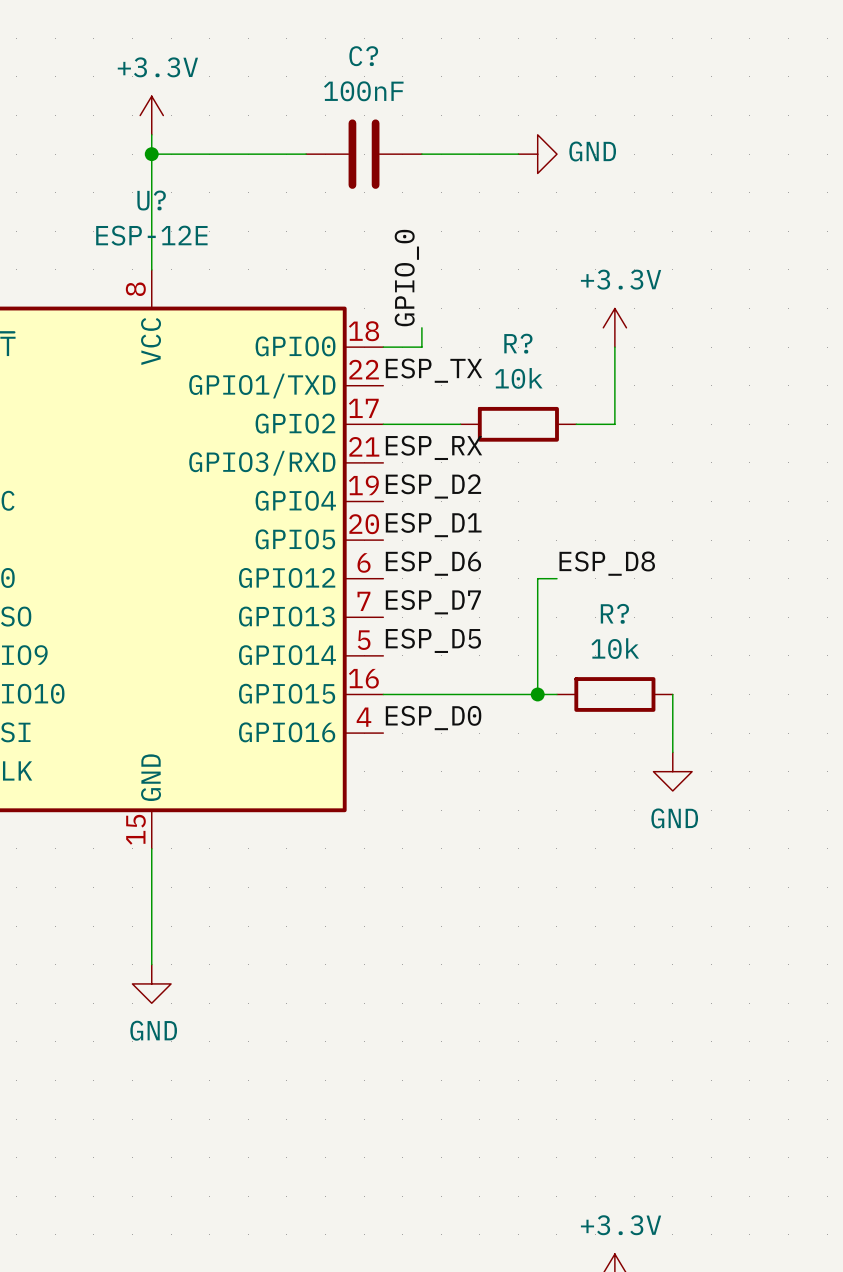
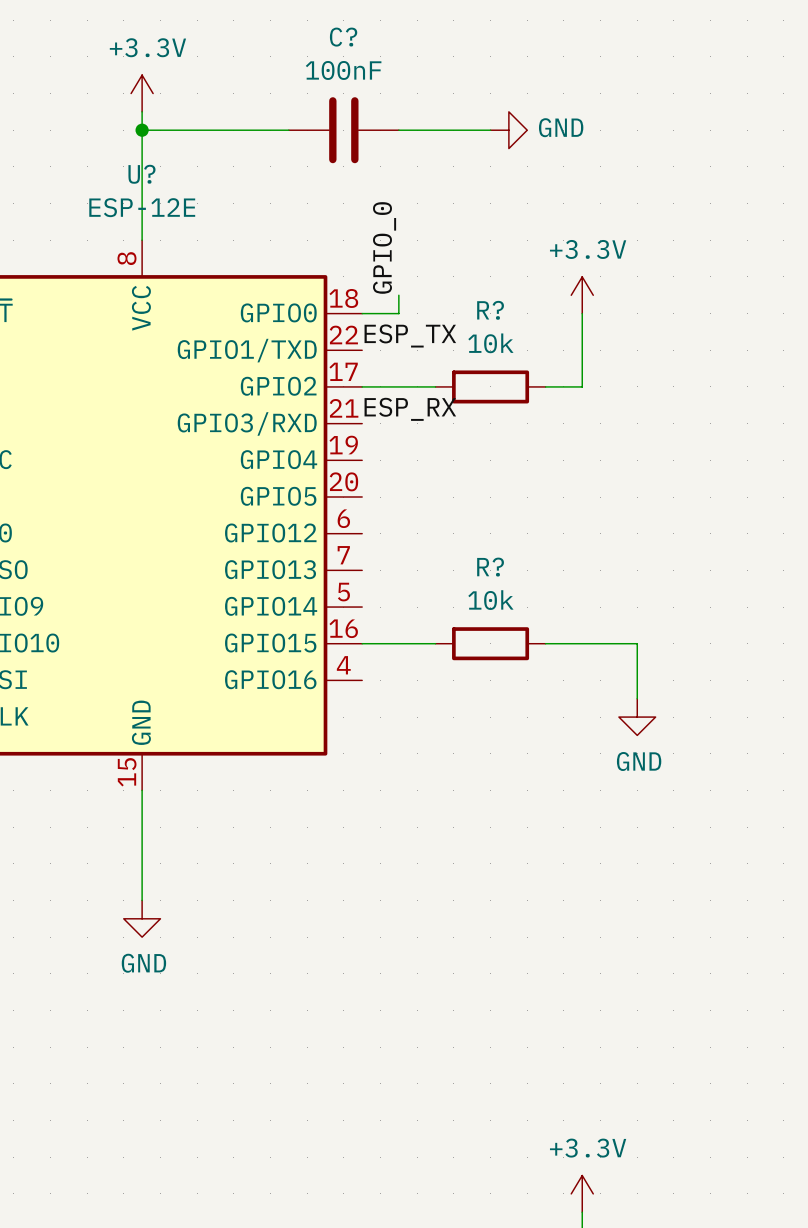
label: ESP_D2 (433, 486) -> none
label: ESP_D1 (433, 525) -> none
label: ESP_D6 (433, 563) -> none
label: ESP_D8 (607, 563) -> none
wire: (556, 578) (537, 578) (537, 694) -> none
label: ESP_D7 (433, 602) -> none
label: ESP_D5 (433, 640) -> none
wire: (460, 694) (556, 694) -> (545, 643) (637, 643)
junction: (537, 694) -> none
R? position: (614, 694) -> (490, 643)
label: ESP_D0 (433, 718) -> none

